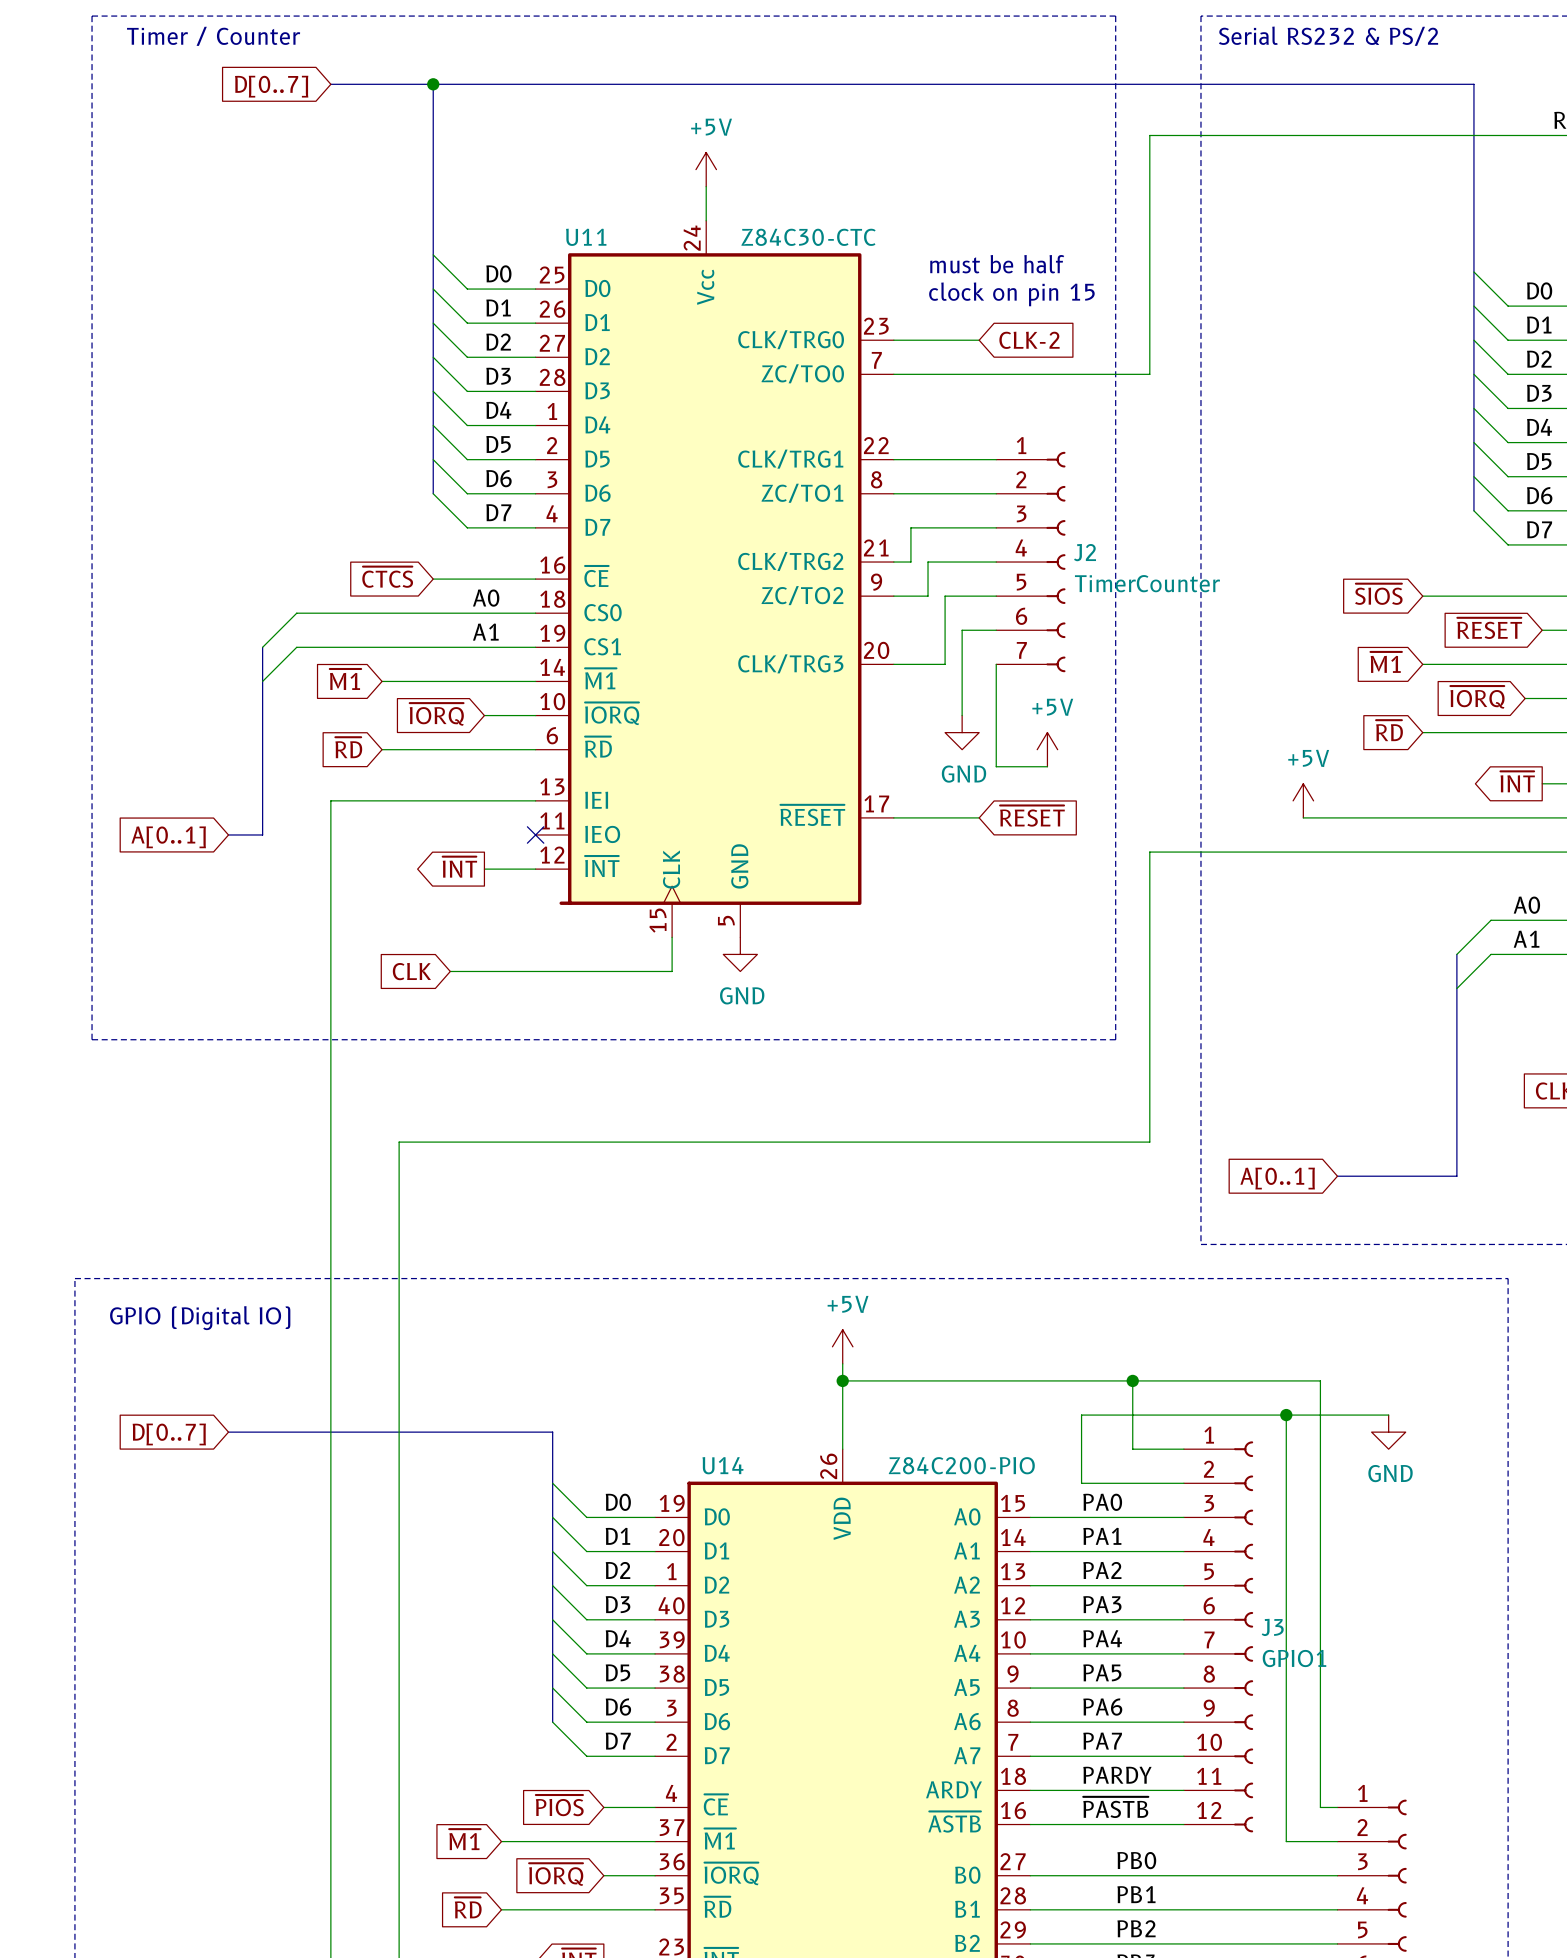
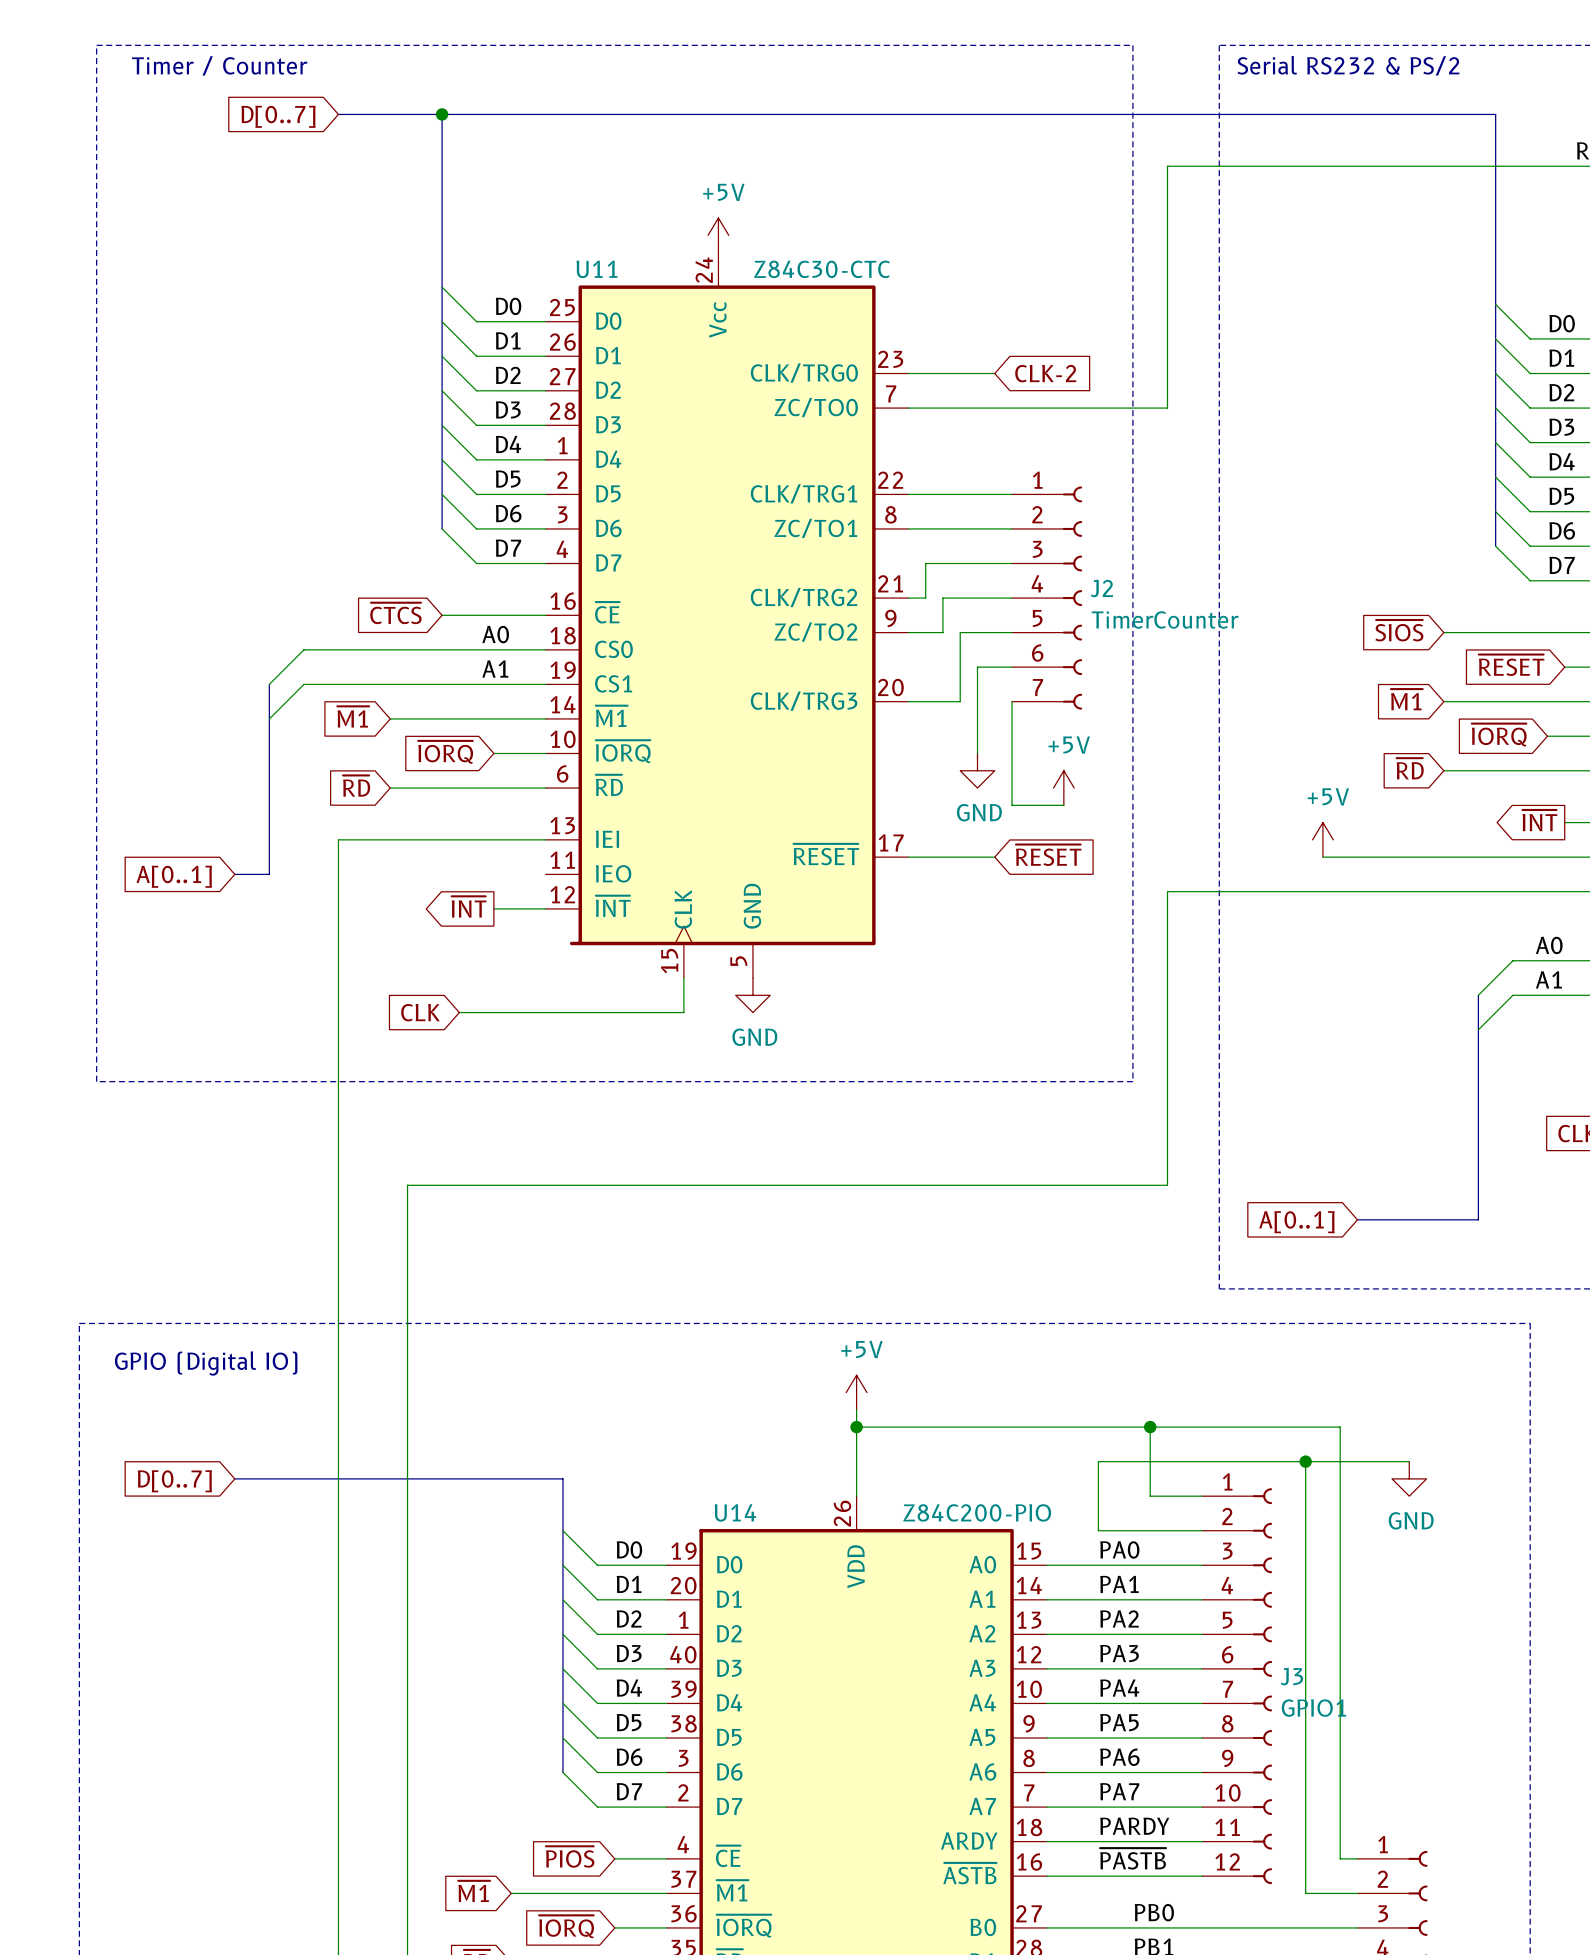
power symbol position: +5V (706, 169) -> +5V (718, 235)
text: must be half (997, 264) -> none
text: clock on pin 15 (1011, 294) -> none
no-connect mark: (535, 834) -> none

